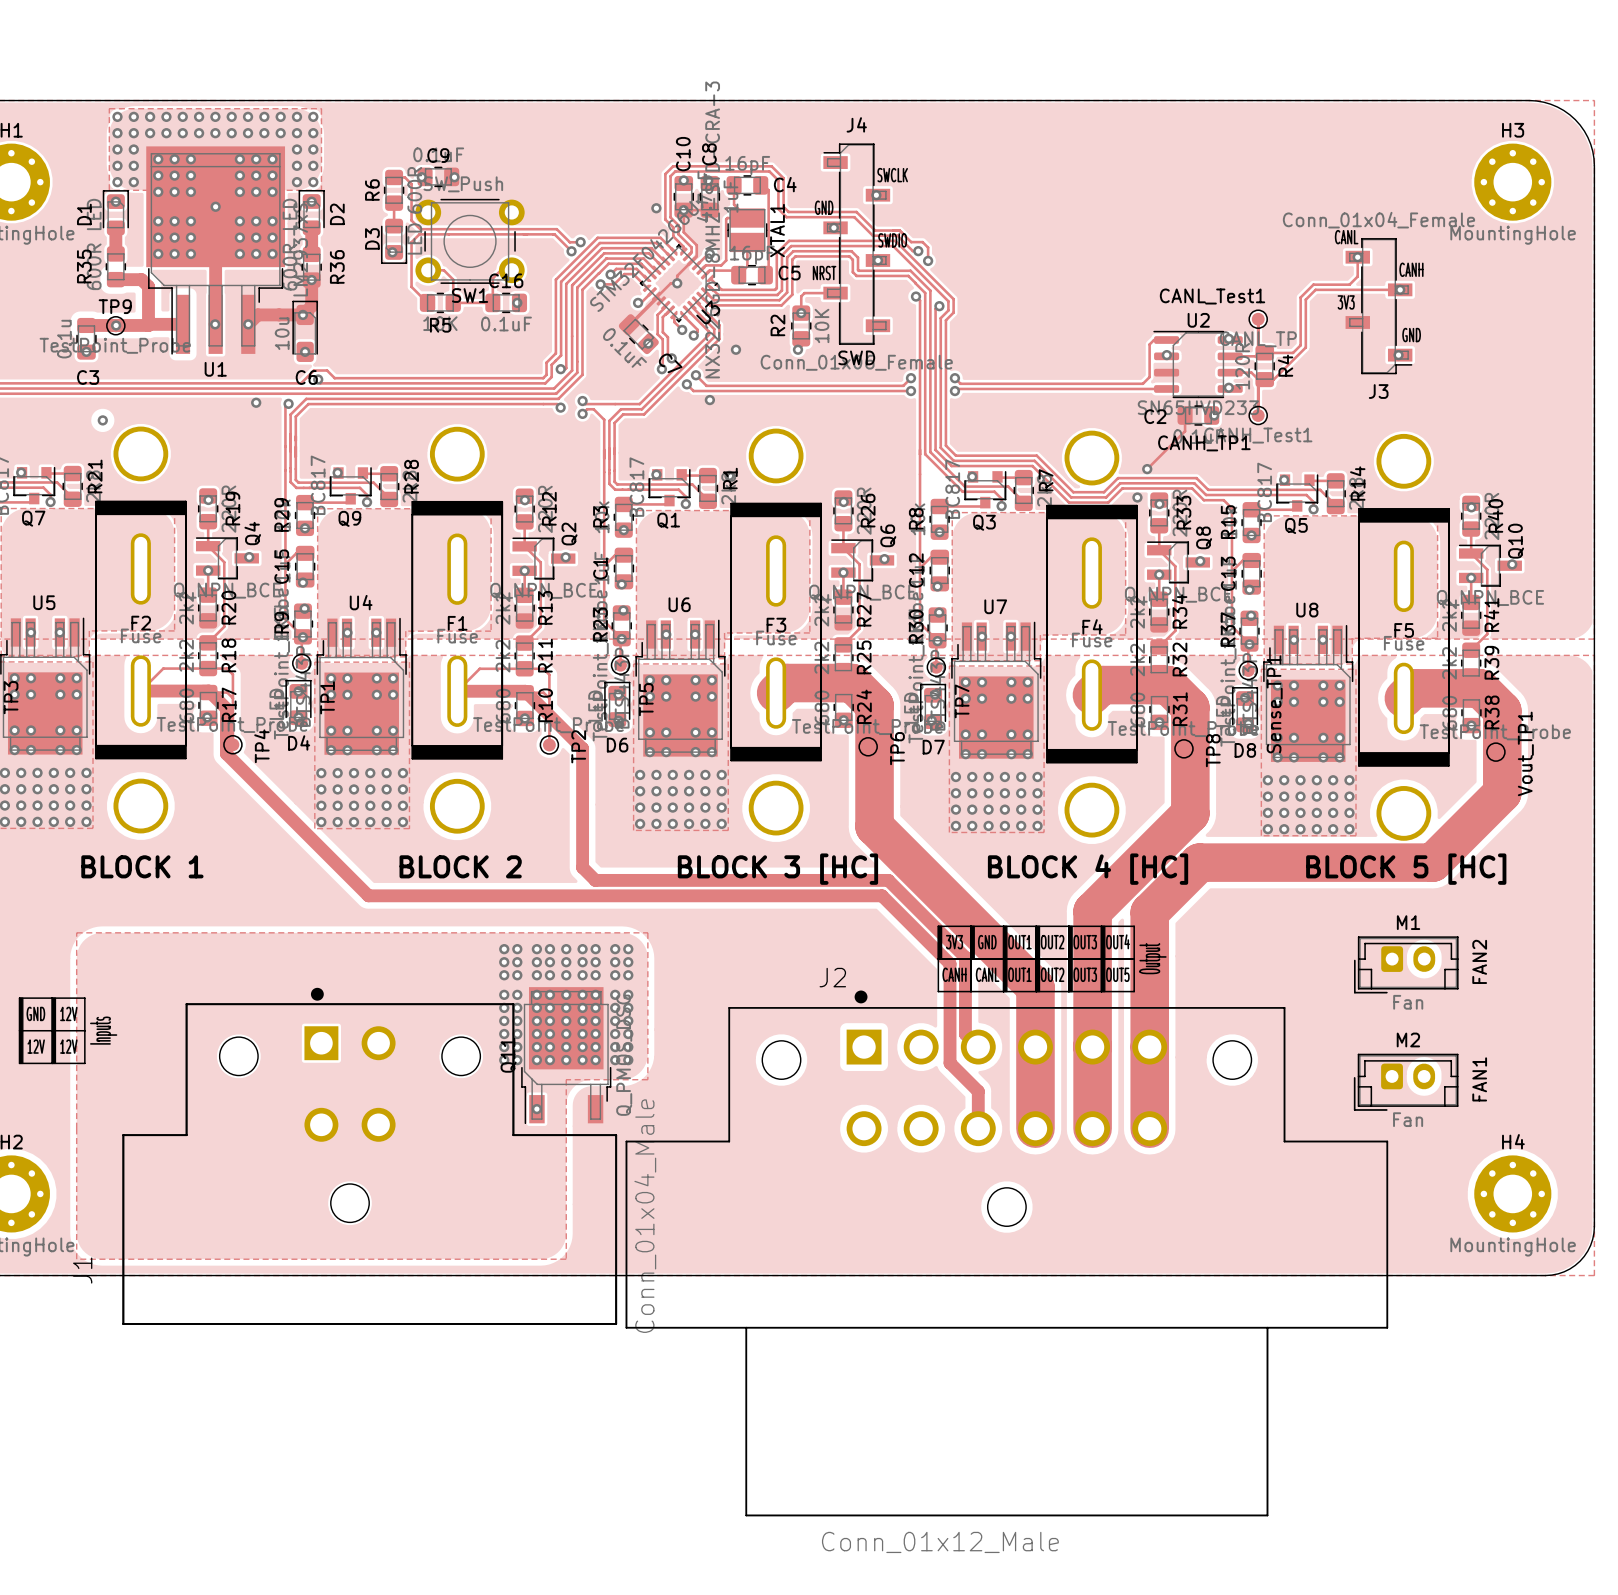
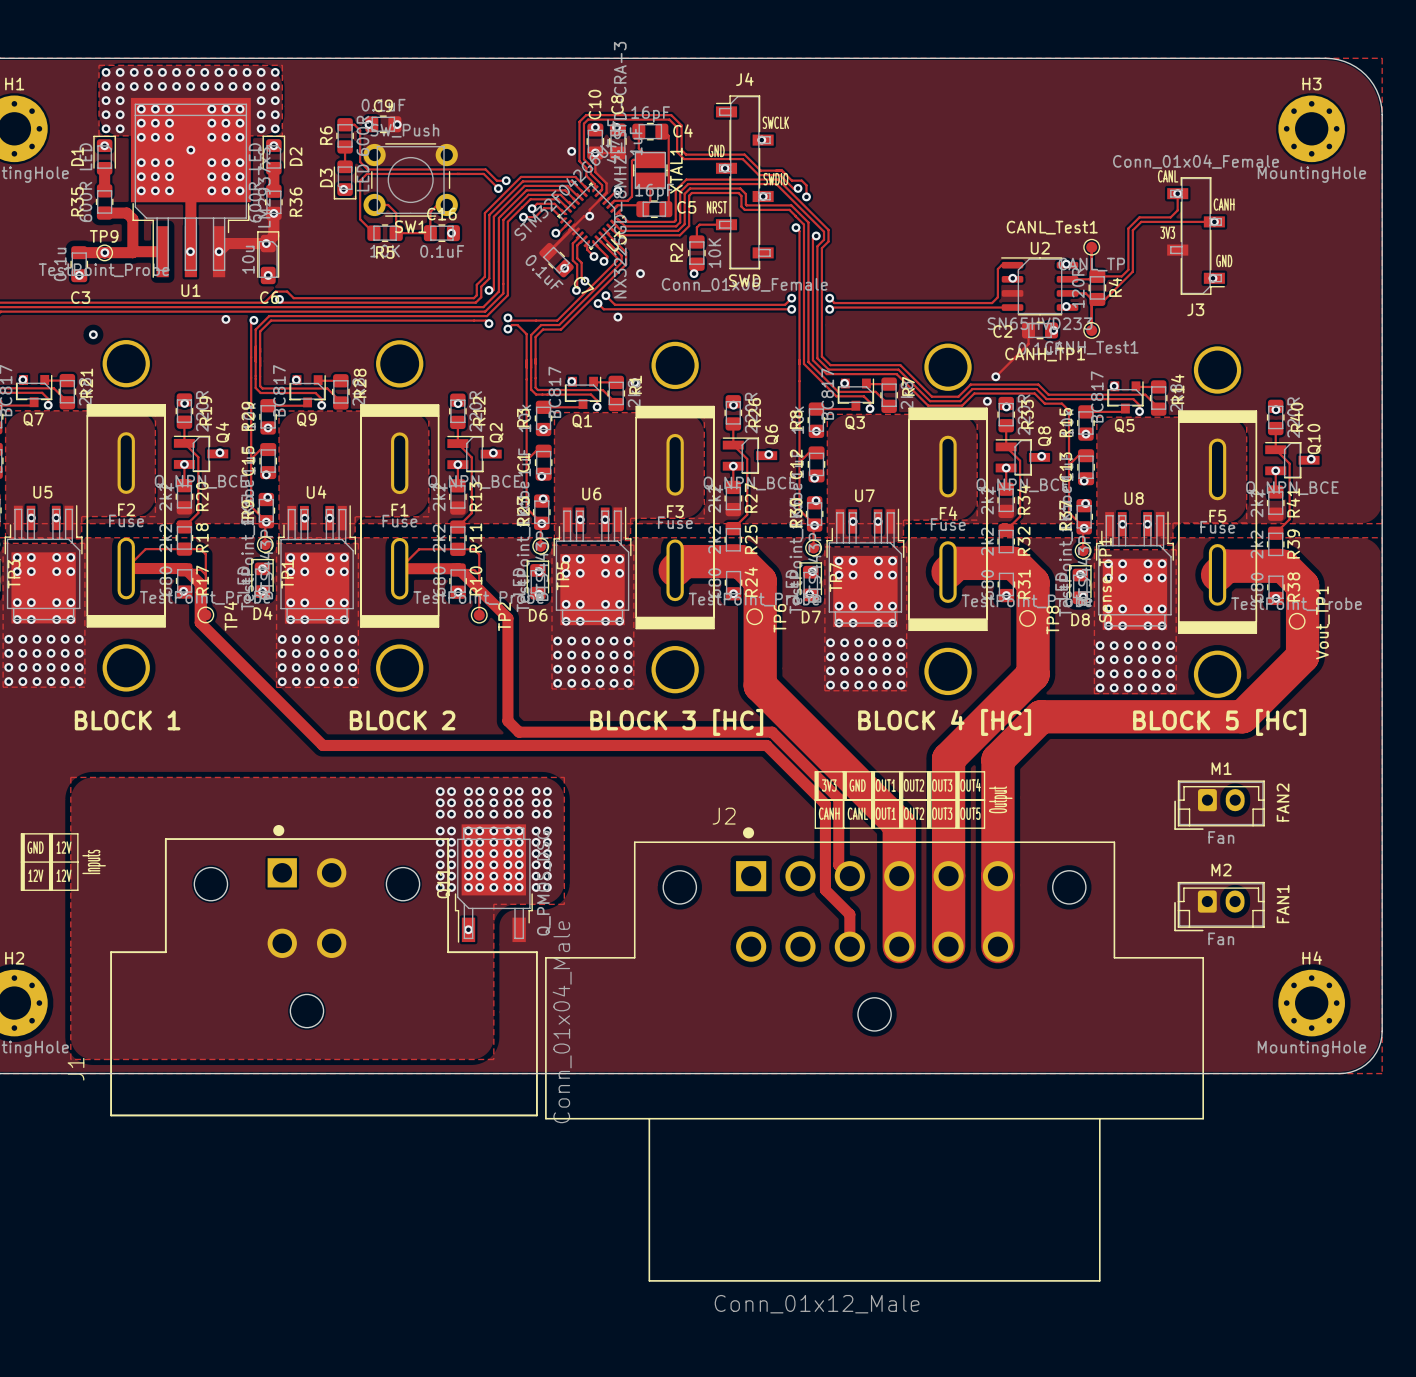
via: (801, 313) -> none

